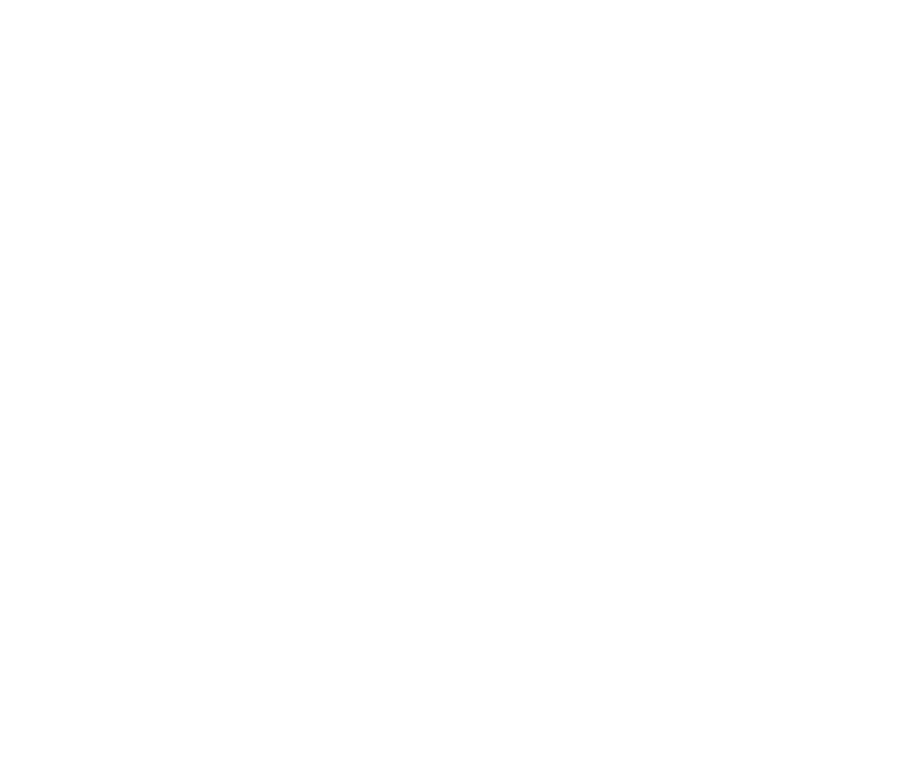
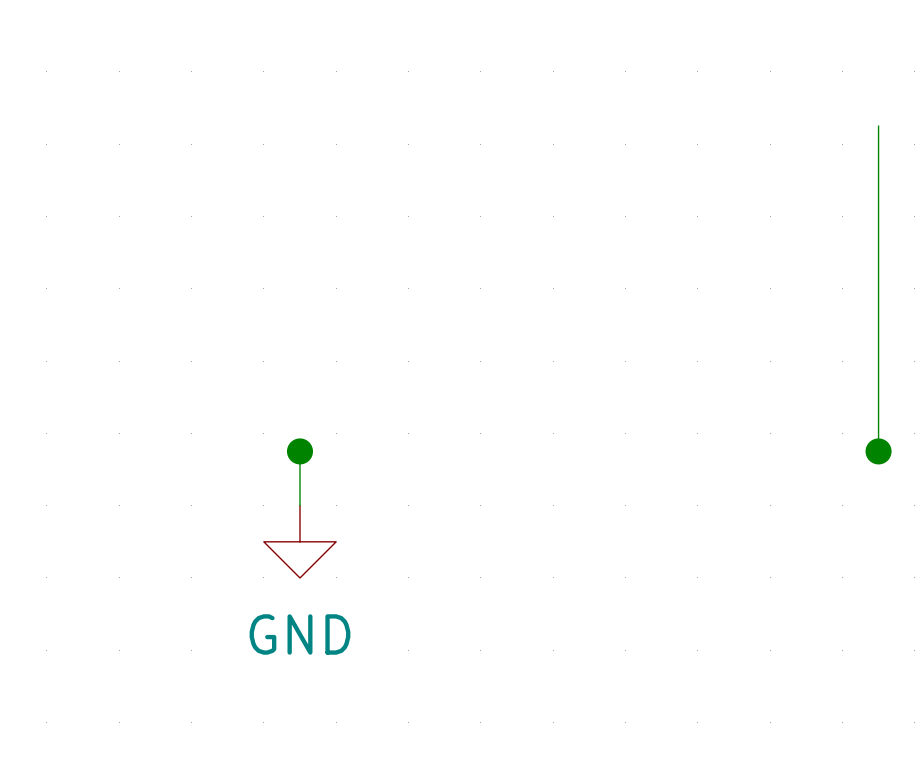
wire: none -> (878, 125) (878, 451)
wire: none -> (299, 451) (299, 505)
junction: none -> (299, 451)
junction: none -> (878, 451)
power symbol: none -> GND (299, 541)

